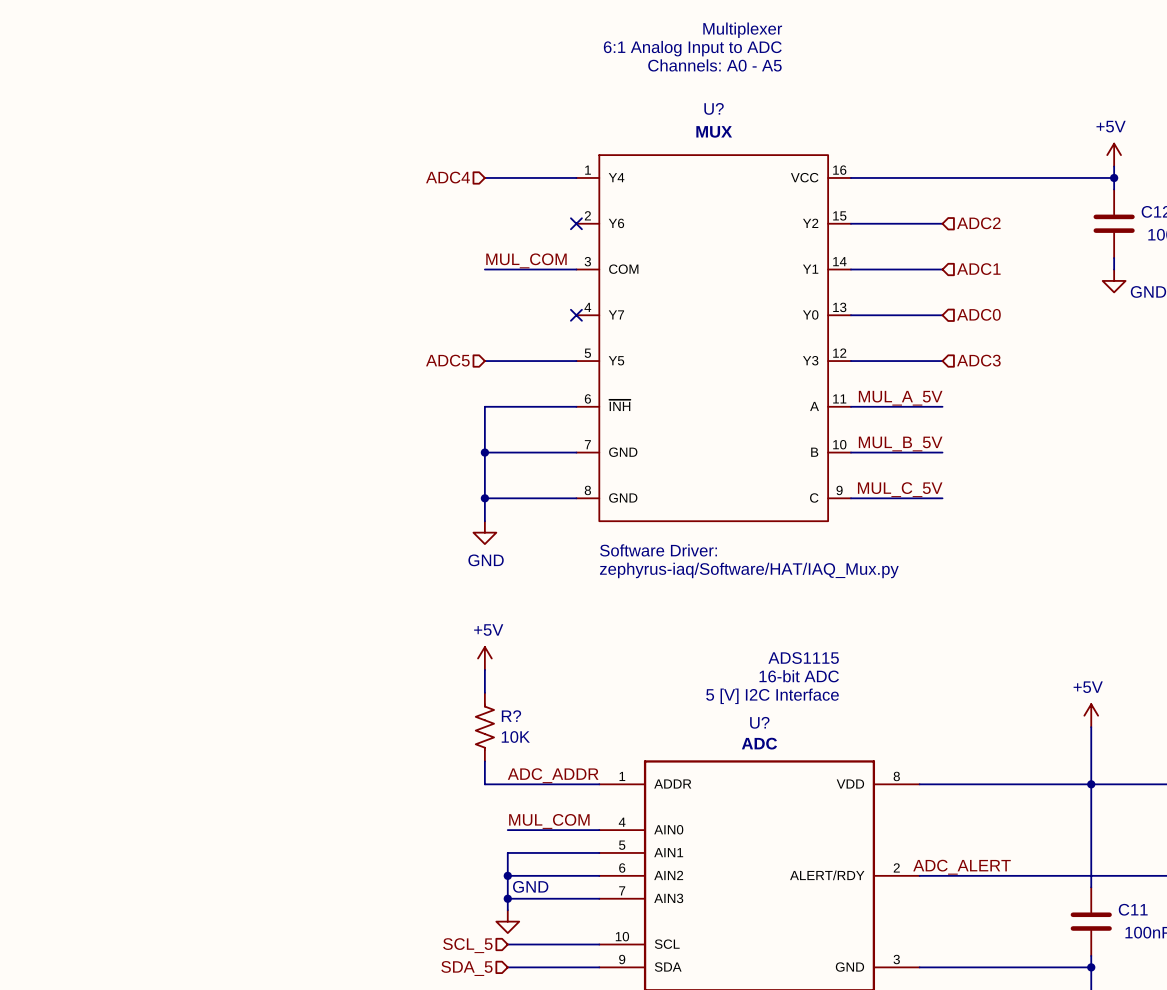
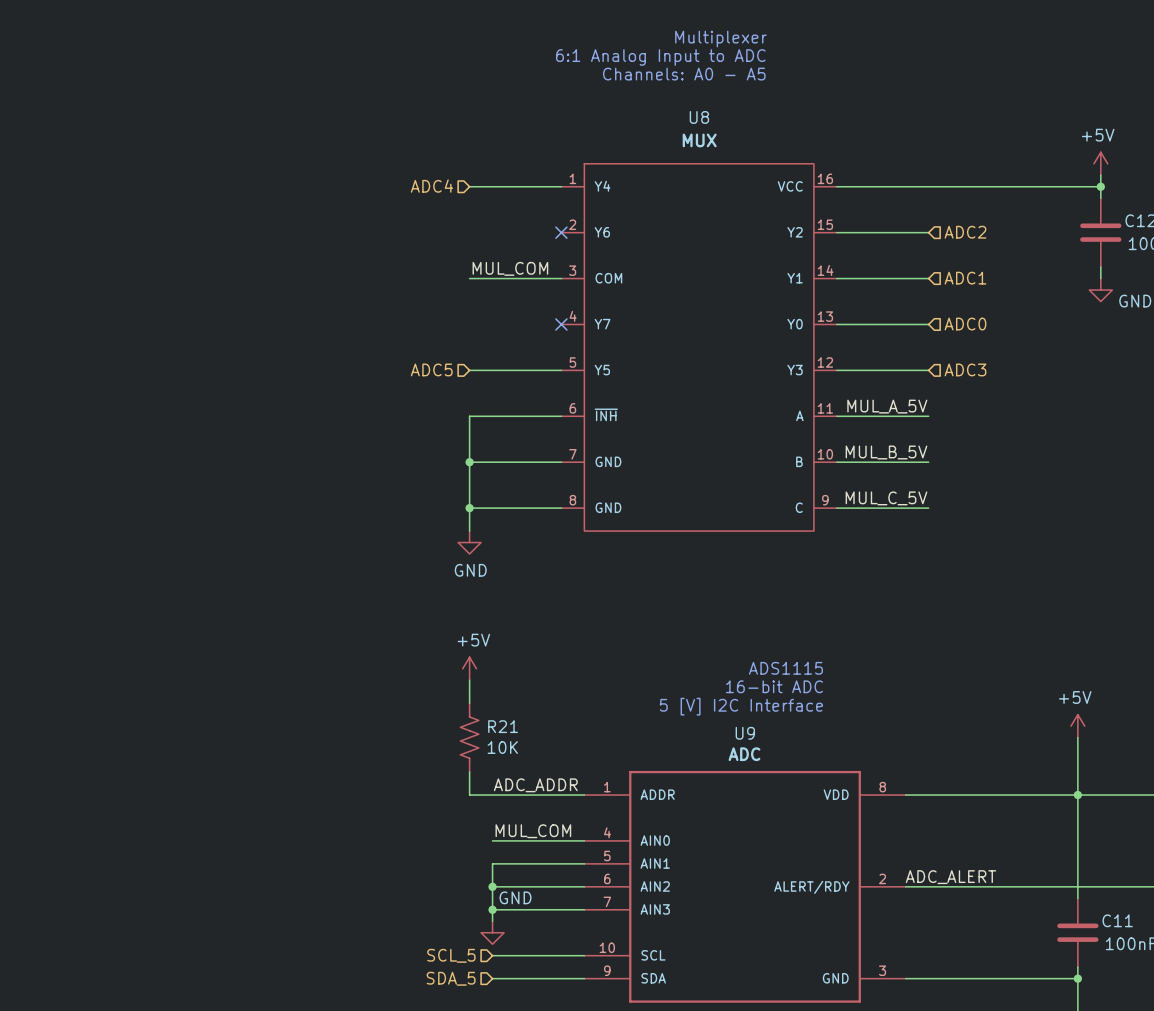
U? name: U? (714, 108) -> U8 (699, 117)
text: Software Driver: (658, 550) -> none
text: zephyrus-iaq/Software/HAT/IAQ_Mux.py (749, 570) -> none
R? name: R? (511, 716) -> R21 (503, 726)
U? name: U? (759, 722) -> U9 (745, 733)

